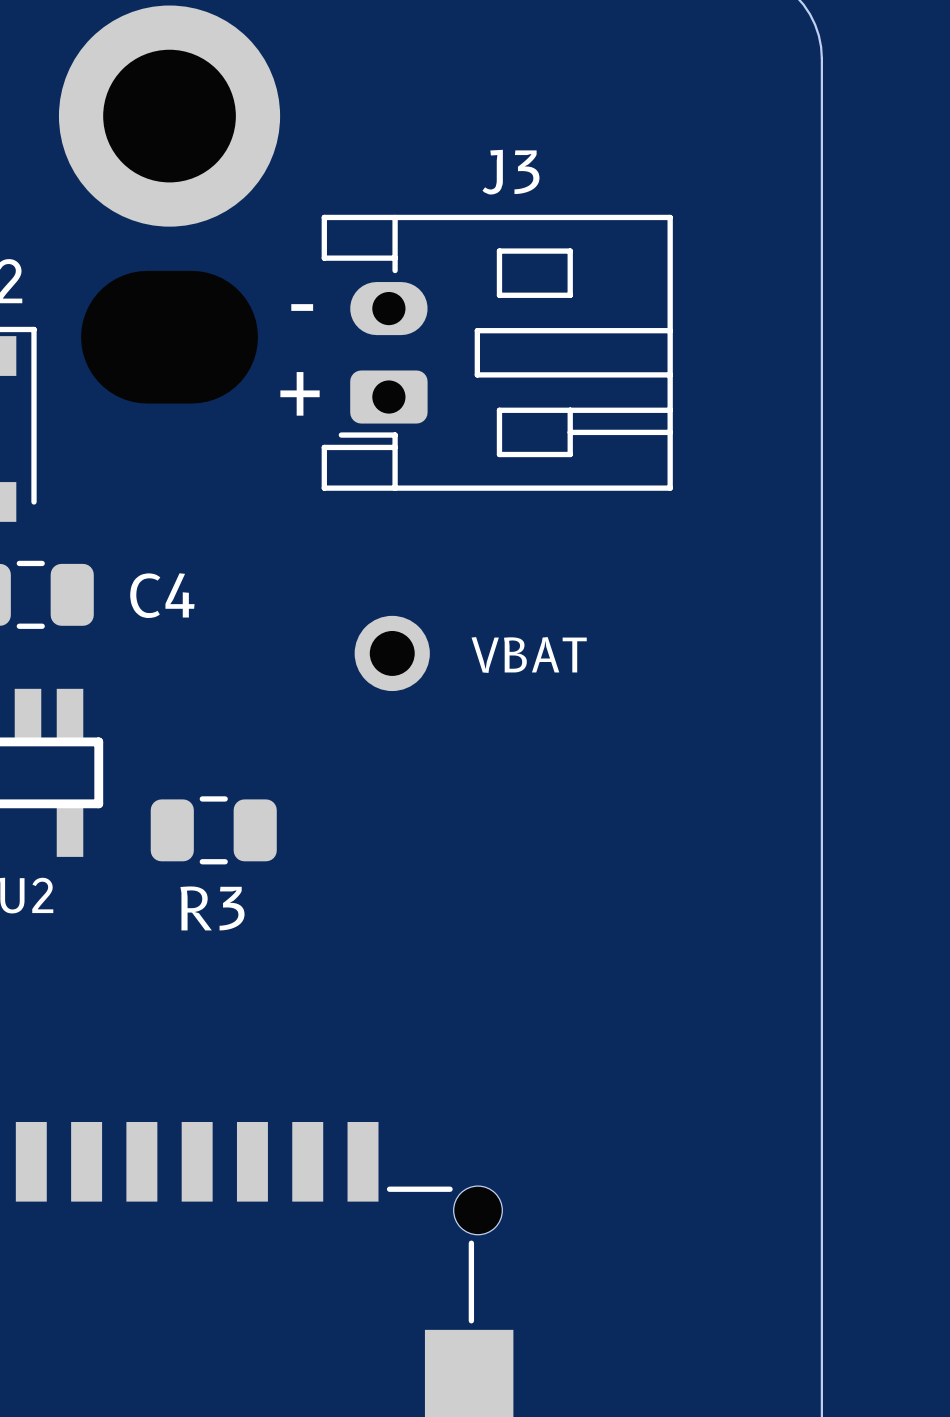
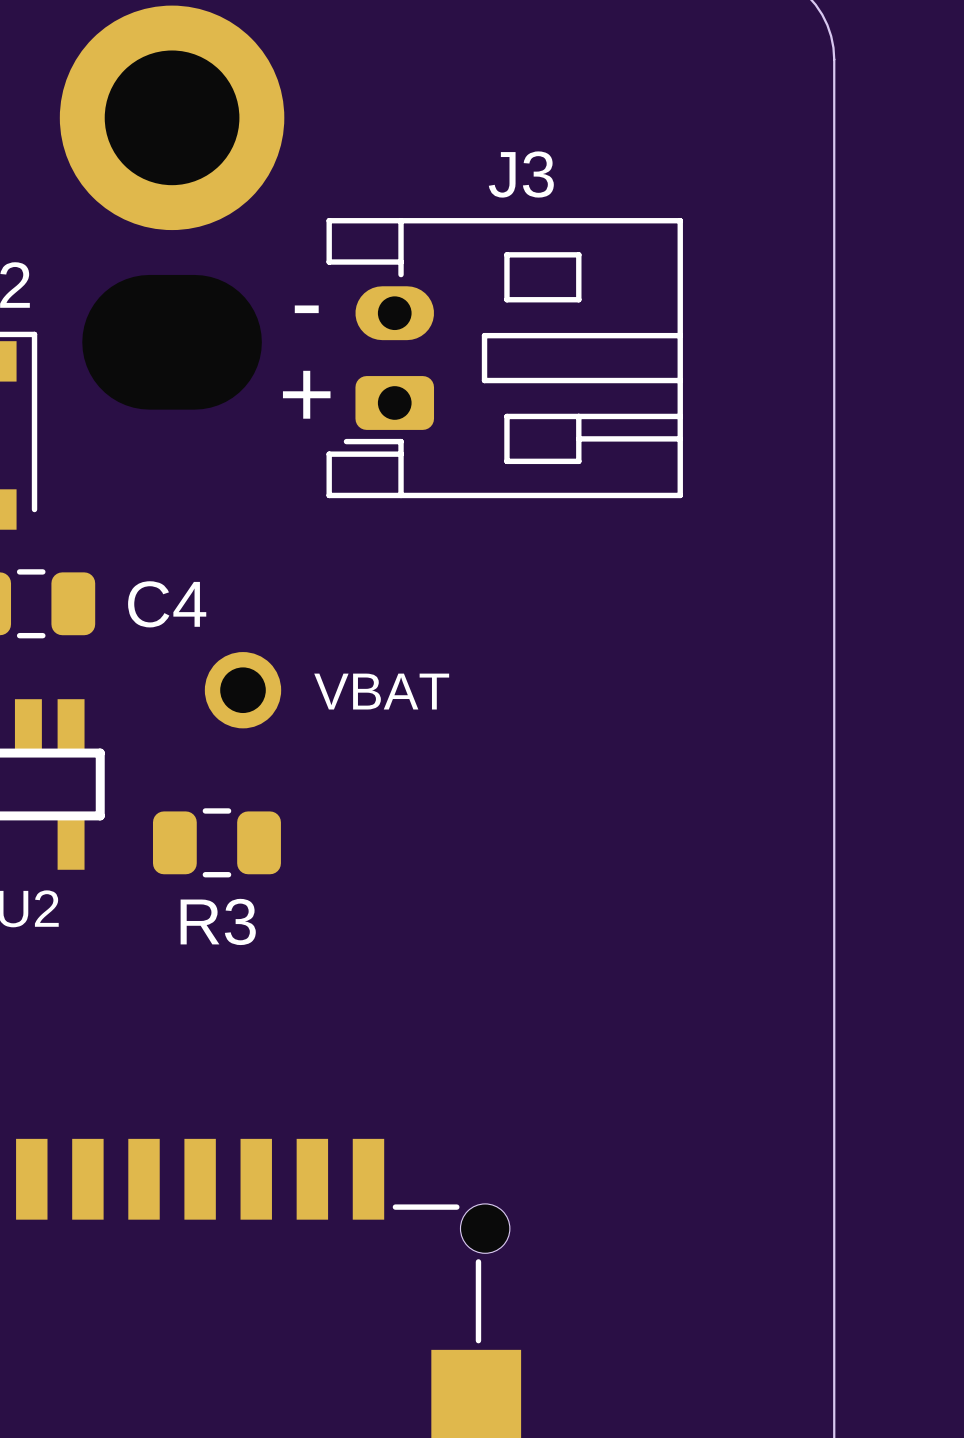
part position: (392, 653) -> (243, 690)

